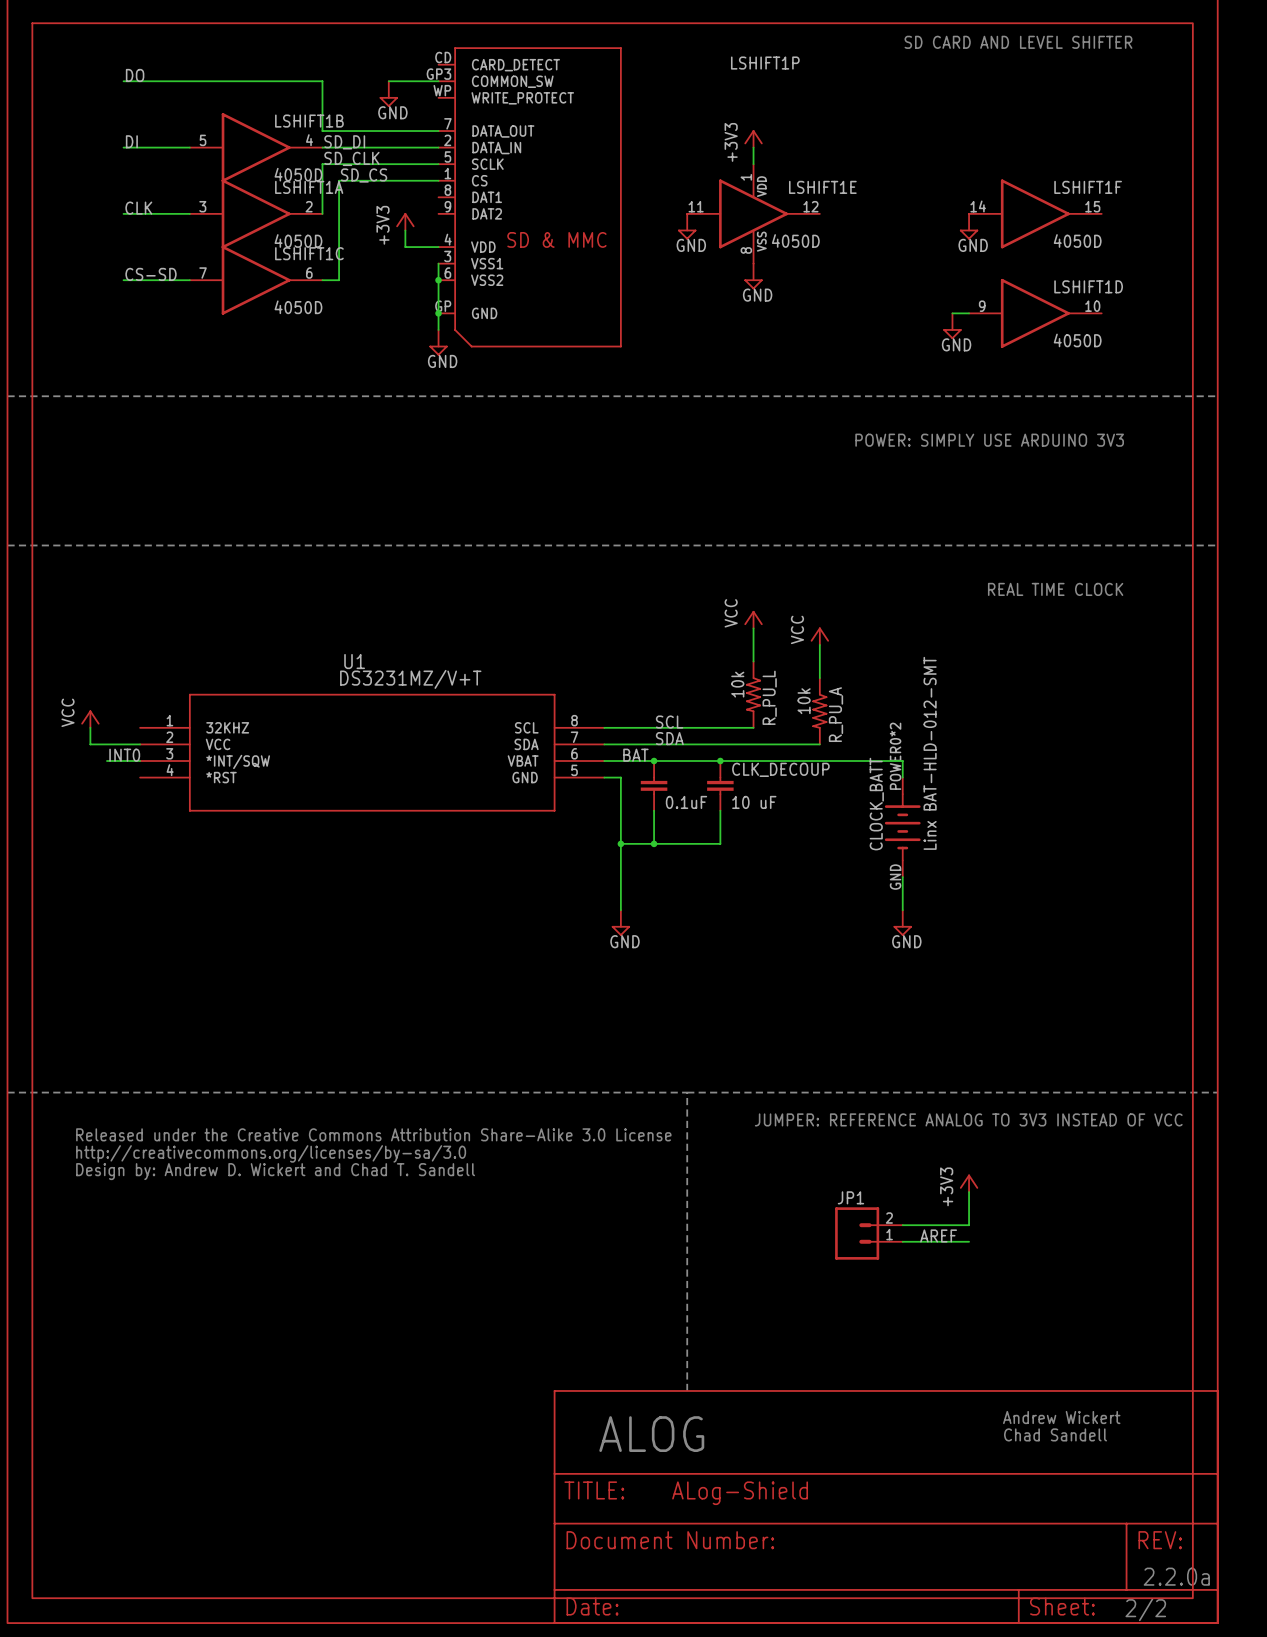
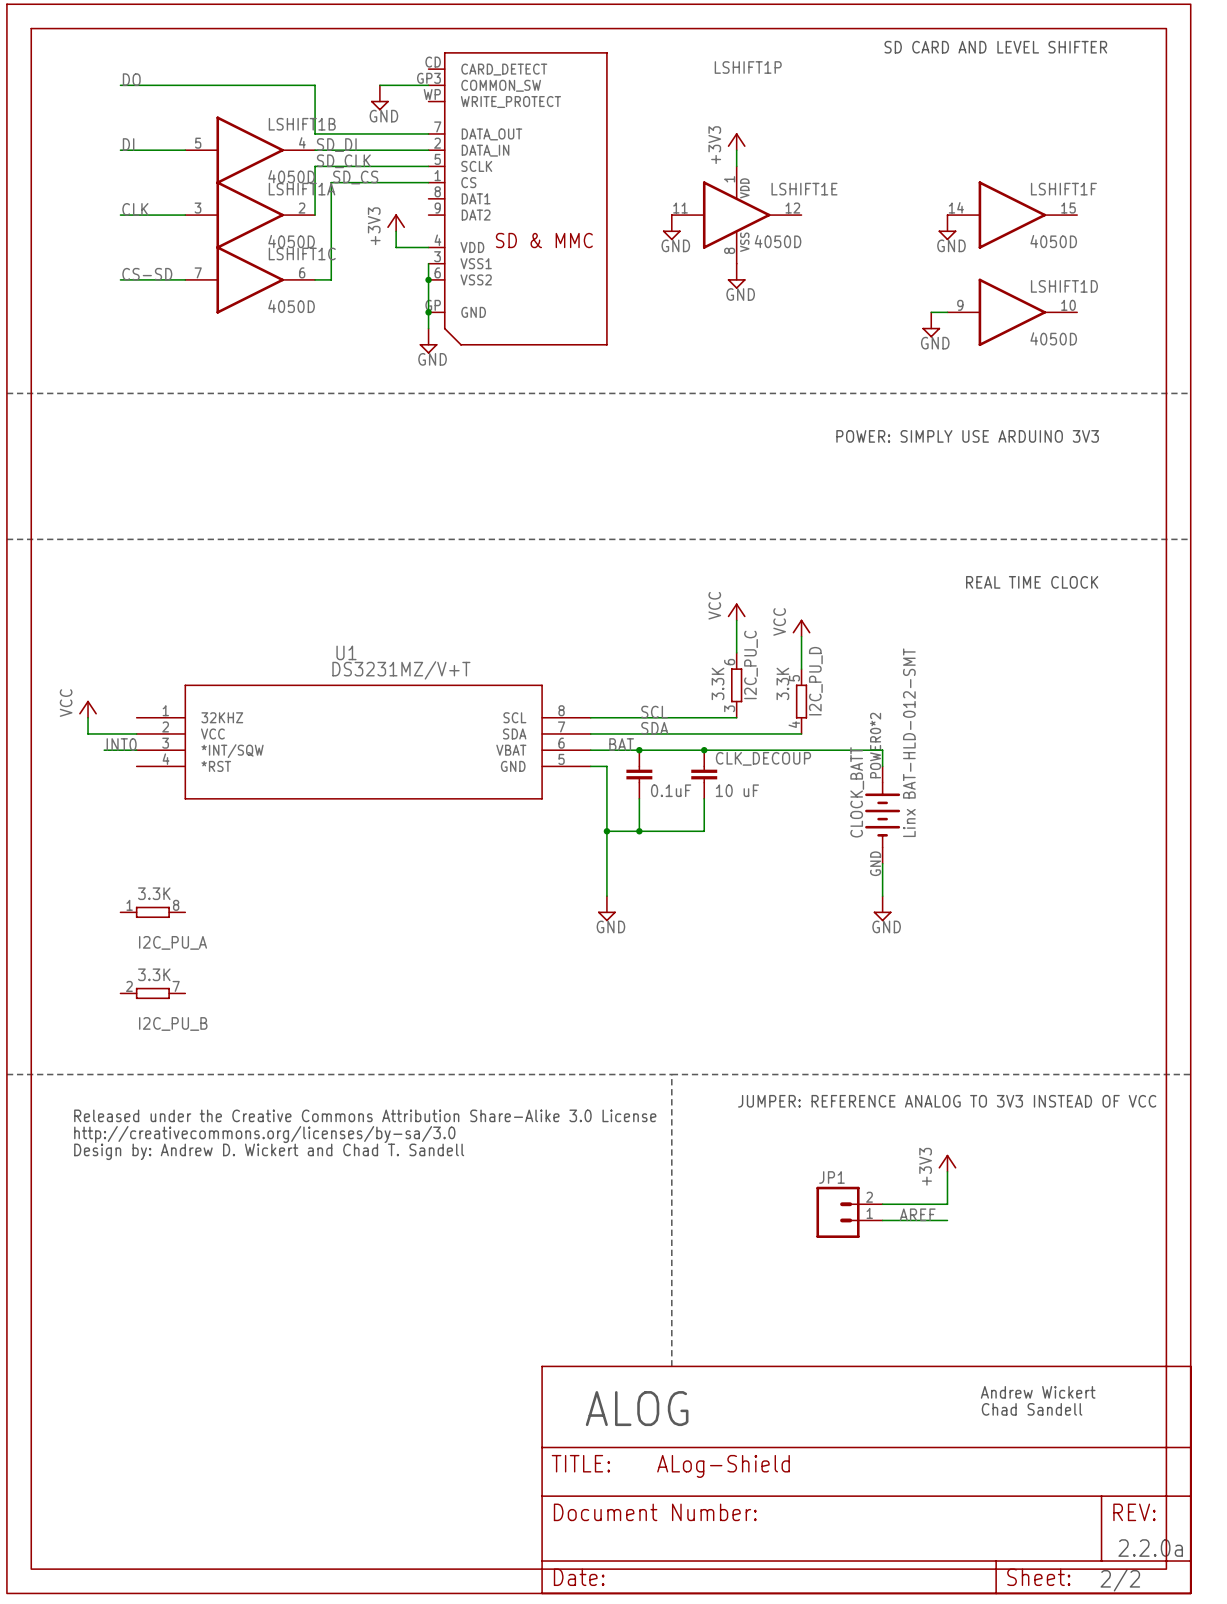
R_PU_L: 10k (753, 694) -> none
I2C_PU_C: none -> 3.3K (736, 685)
R_PU_A: 10k (819, 711) -> none
I2C_PU_D: none -> 3.3K (801, 701)
I2C_PU_A: none -> 3.3K (152, 912)
I2C_PU_B: none -> 3.3K (152, 993)

